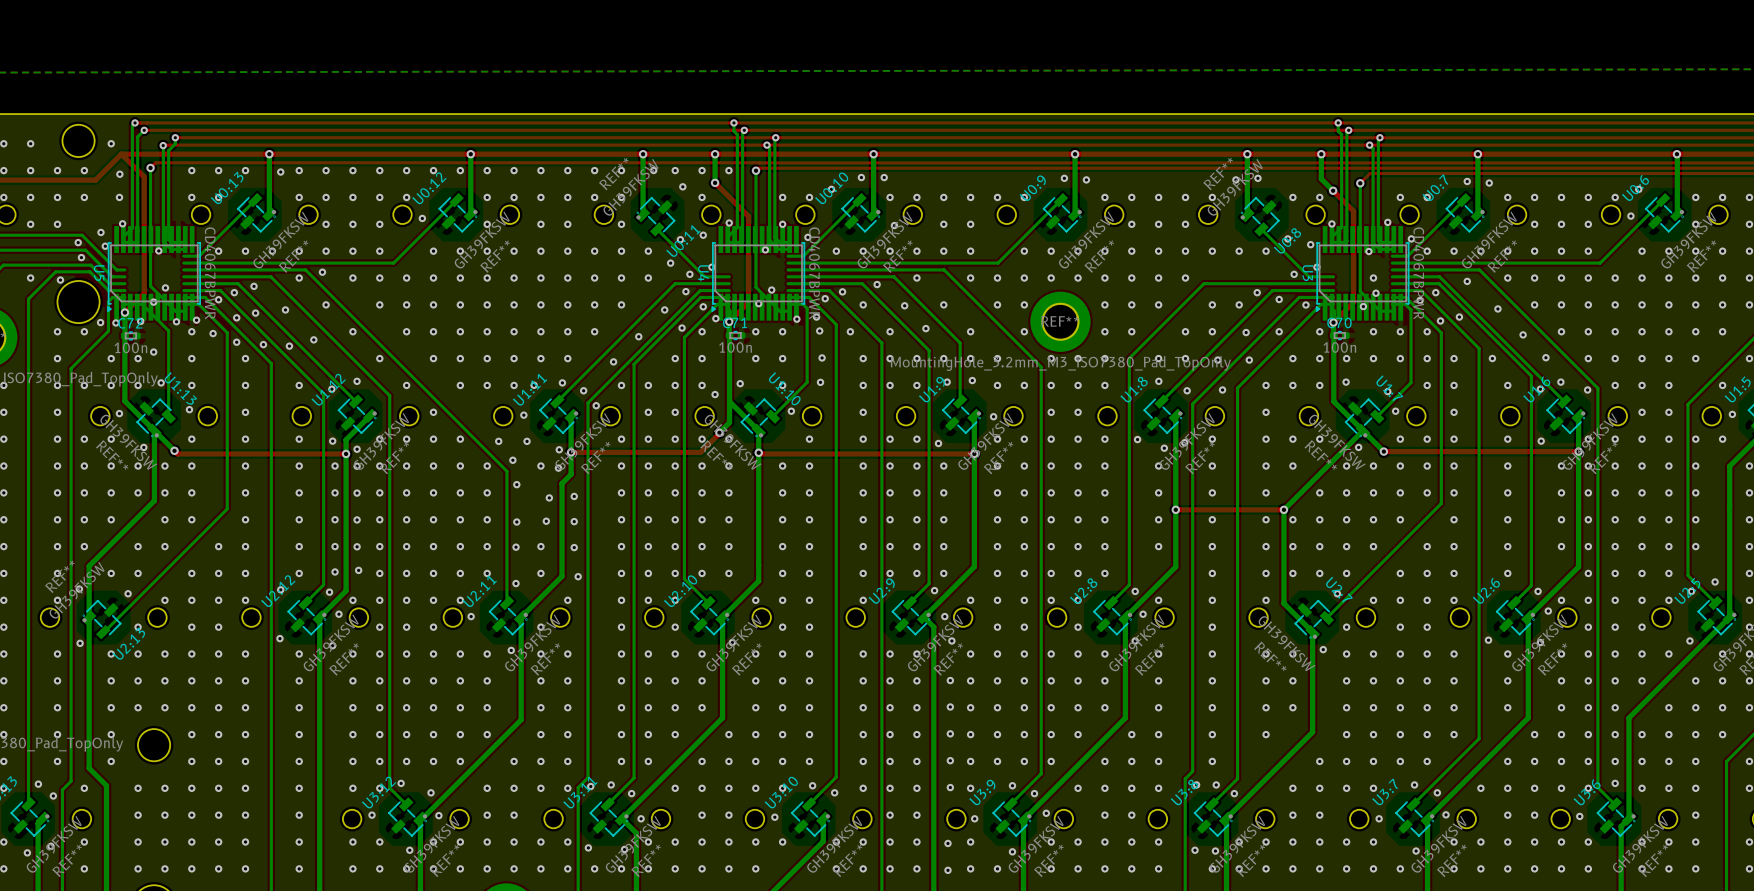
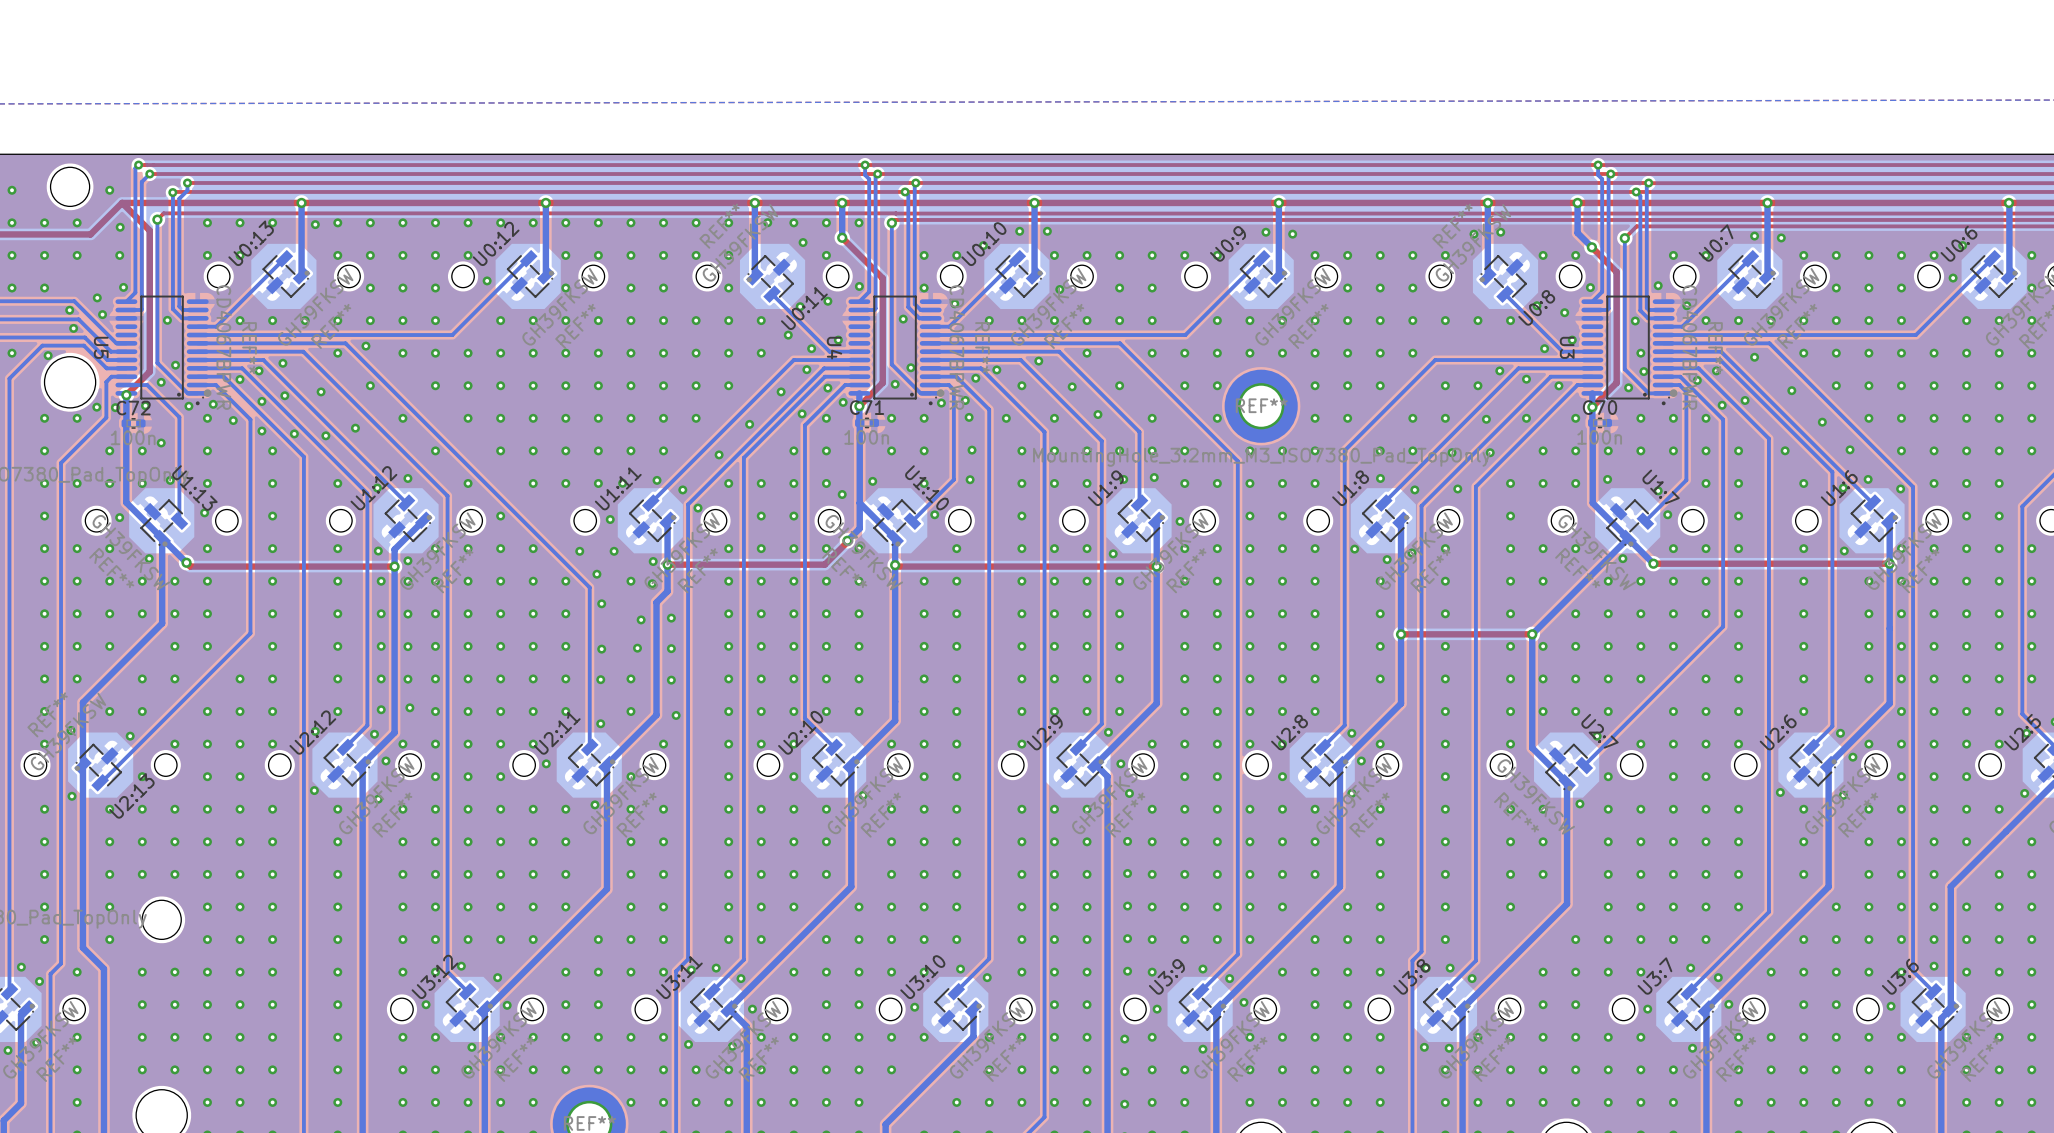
U5 footprint: [107, 226, 201, 321] -> [115, 295, 212, 406]
U4 footprint: [711, 226, 806, 321] -> [848, 295, 945, 406]
U3 footprint: [1315, 226, 1410, 321] -> [1581, 295, 1678, 406]

